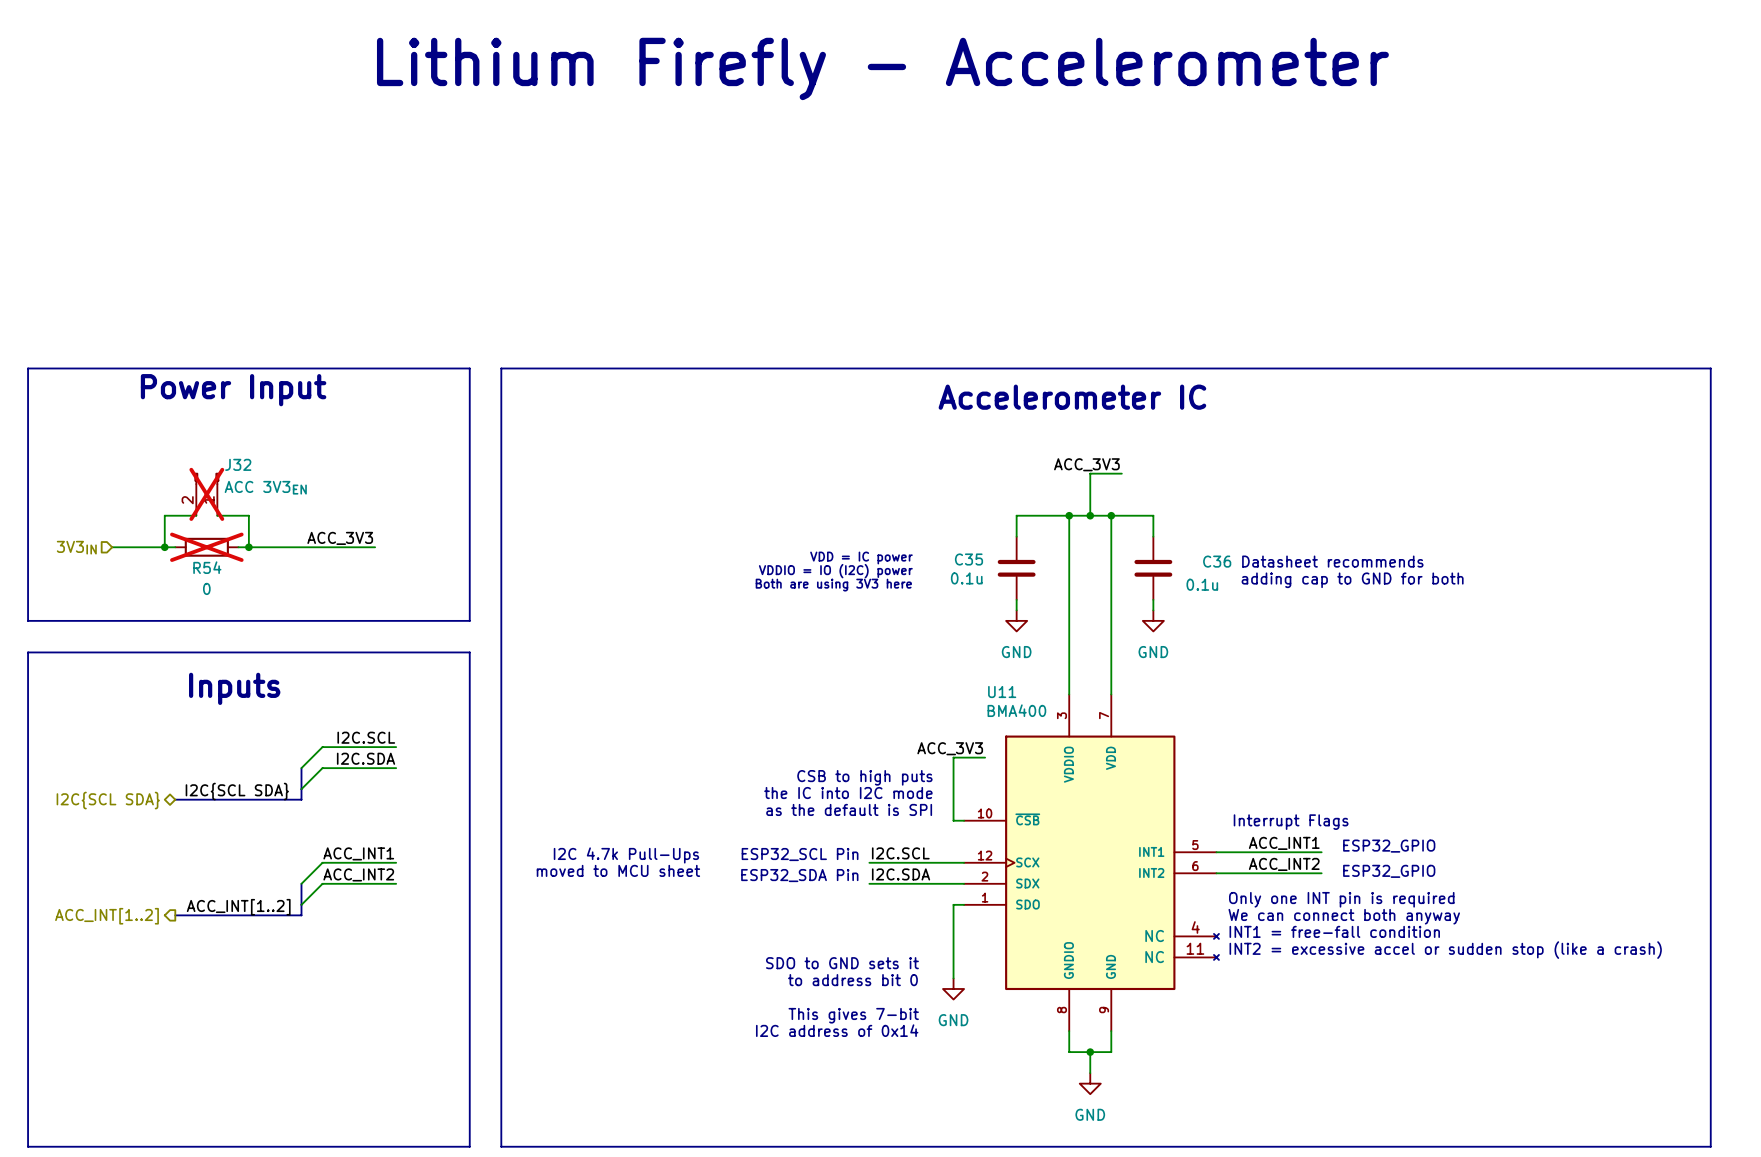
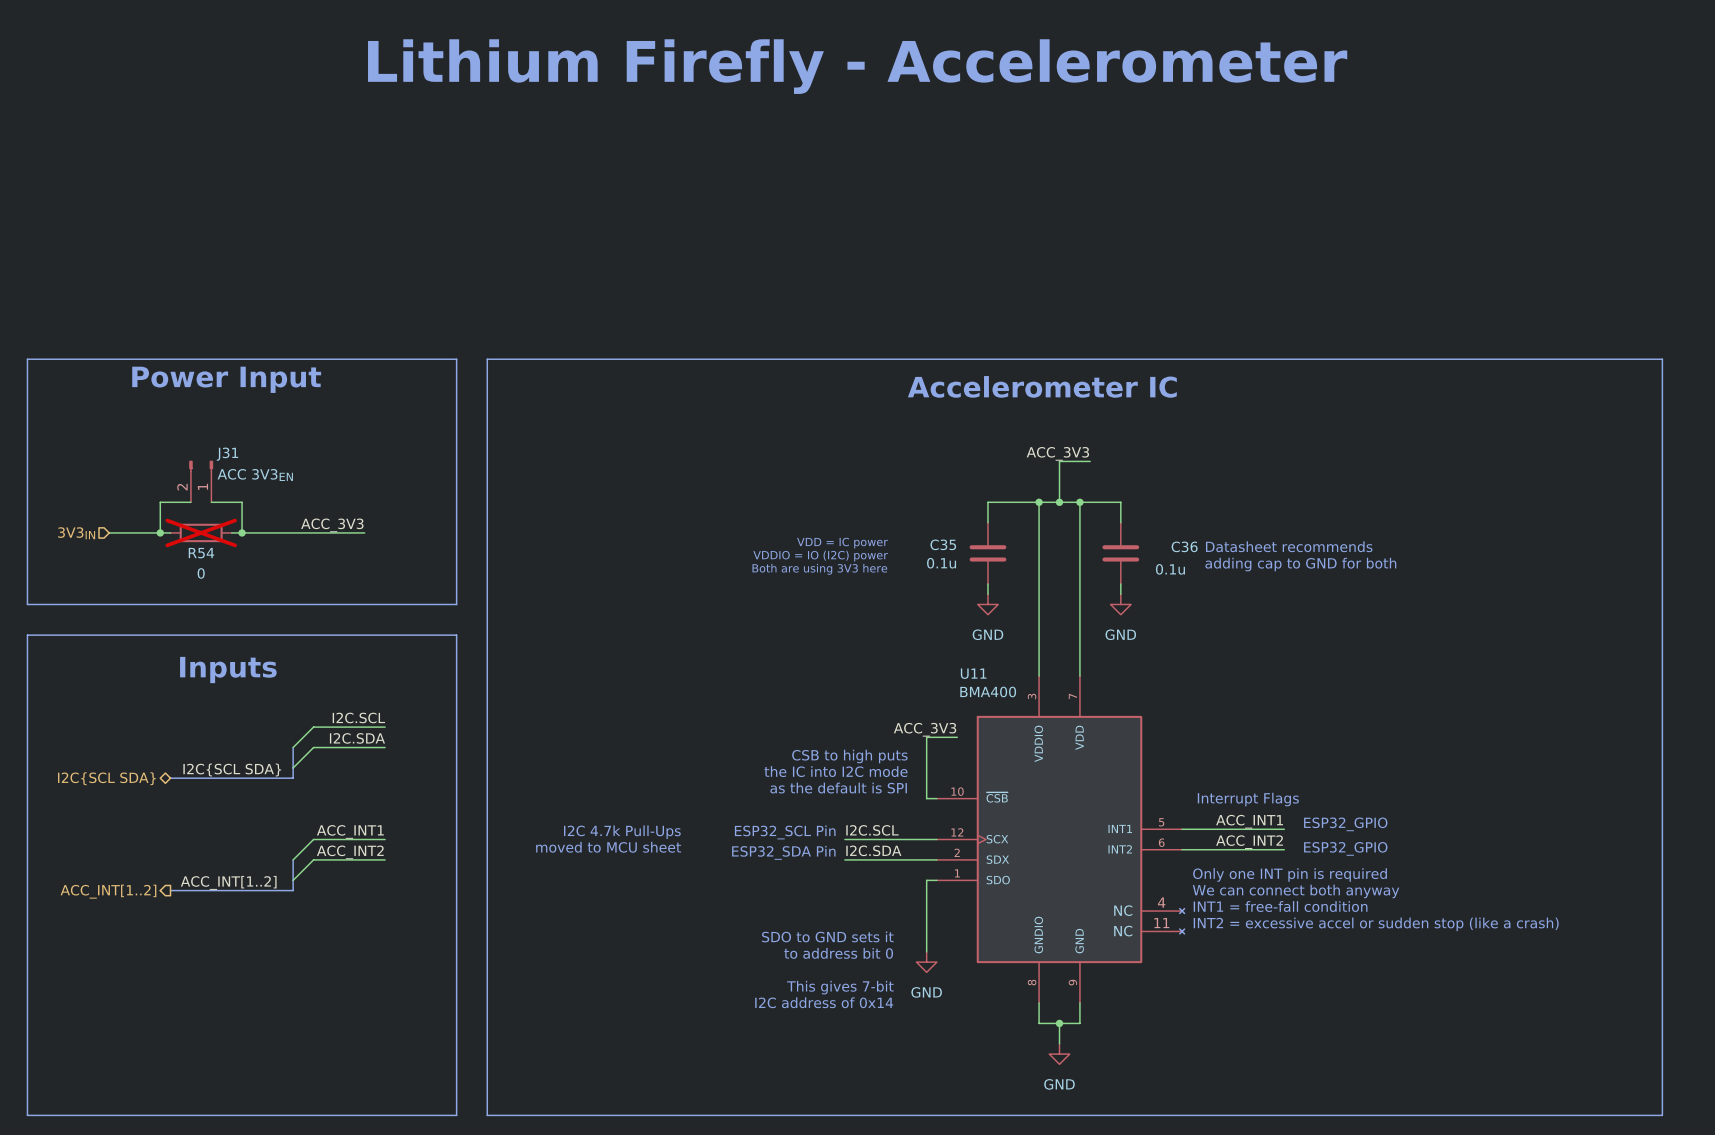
J32 name: J32 (238, 464) -> J31 (227, 454)
J32 do-not-place cross: (206, 494) -> none

